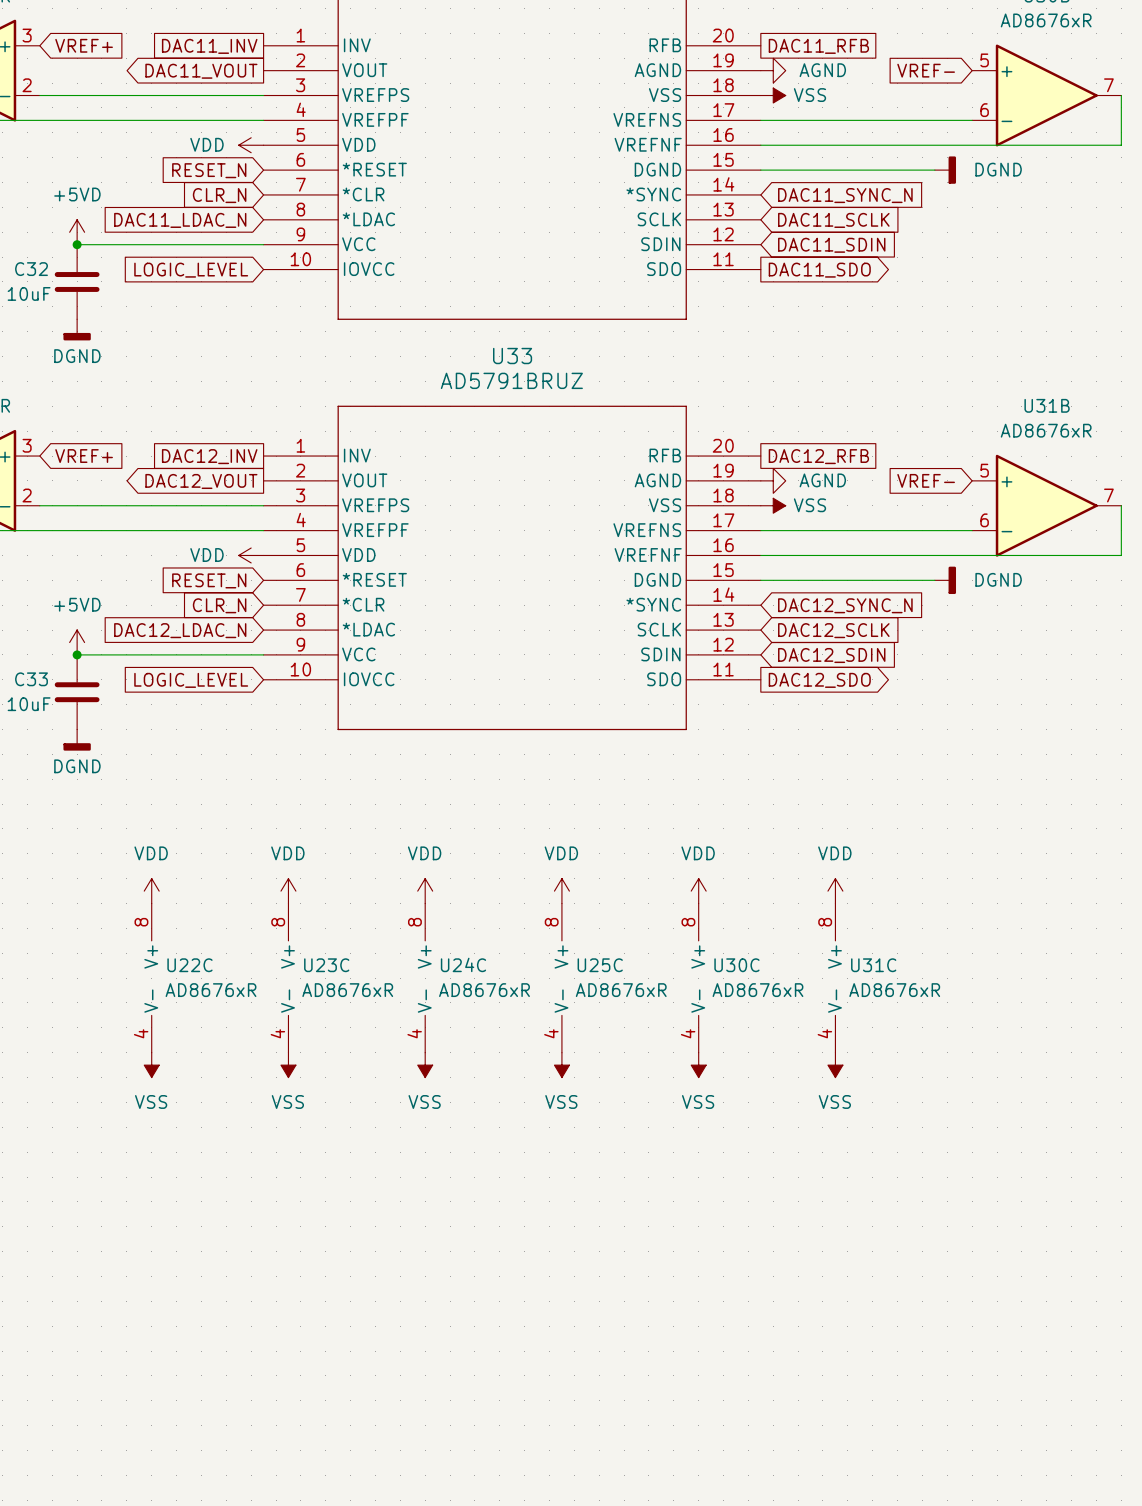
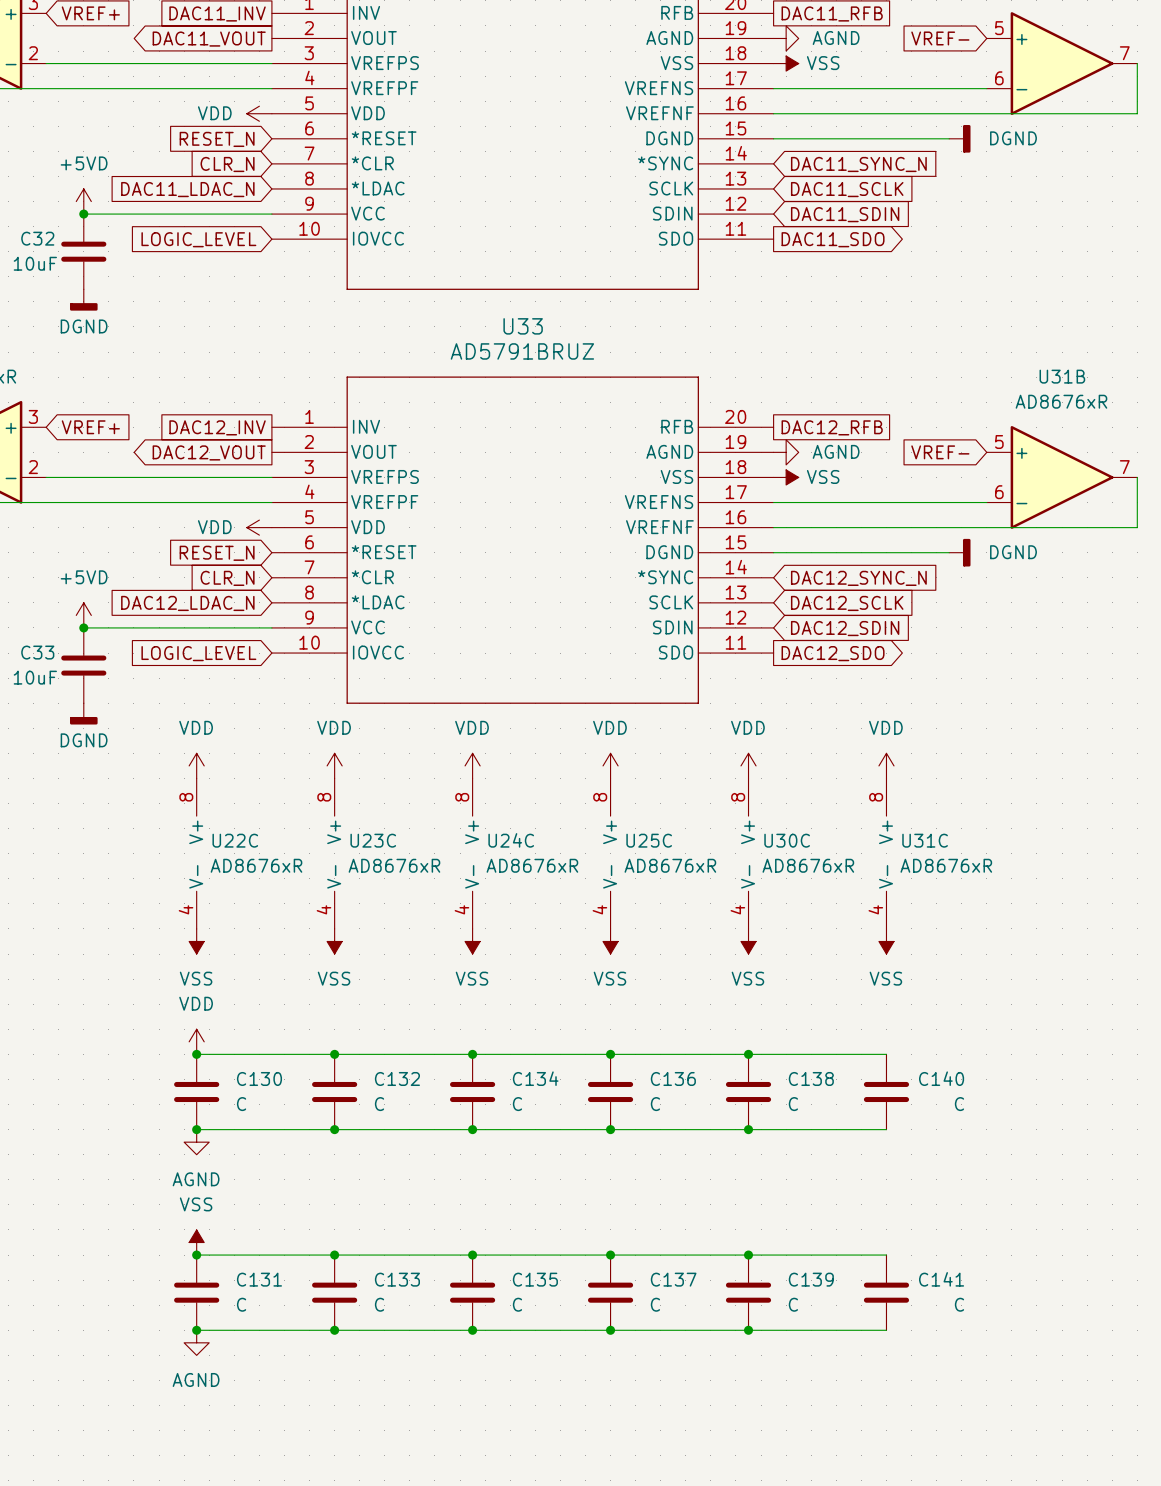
power symbol: none -> VDD (196, 765)
power symbol: none -> VDD (334, 765)
power symbol: none -> VDD (472, 765)
power symbol: none -> VDD (610, 765)
power symbol: none -> VDD (748, 765)
power symbol: none -> VDD (886, 765)
power symbol: VDD (151, 891) -> none
power symbol: VDD (288, 891) -> none
power symbol: VDD (425, 891) -> none
power symbol: VDD (561, 891) -> none
power symbol: VDD (698, 891) -> none
power symbol: VDD (835, 891) -> none
power symbol: none -> VSS (196, 941)
power symbol: none -> VSS (334, 941)
power symbol: none -> VSS (472, 941)
power symbol: none -> VSS (610, 941)
power symbol: none -> VSS (748, 941)
power symbol: none -> VSS (886, 941)
U22C position: (151, 978) -> (196, 853)
U23C position: (288, 978) -> (334, 853)
U24C position: (425, 978) -> (472, 853)
U25C position: (561, 978) -> (610, 853)
U30C position: (698, 978) -> (748, 853)
U31C position: (835, 978) -> (886, 853)
power symbol: VSS (151, 1065) -> none
power symbol: none -> VDD (196, 1041)
power symbol: VSS (288, 1065) -> none
power symbol: VSS (425, 1065) -> none
power symbol: VSS (561, 1065) -> none
power symbol: VSS (698, 1065) -> none
power symbol: VSS (835, 1065) -> none
wire: none -> (196, 1054) (886, 1054)
junction: none -> (196, 1054)
junction: none -> (334, 1054)
junction: none -> (472, 1054)
junction: none -> (610, 1054)
junction: none -> (748, 1054)
C130: none -> C (196, 1091)
C132: none -> C (334, 1091)
C134: none -> C (472, 1091)
C136: none -> C (610, 1091)
C138: none -> C (748, 1091)
C140: none -> C (886, 1091)
wire: none -> (196, 1129) (886, 1129)
junction: none -> (196, 1129)
junction: none -> (334, 1129)
junction: none -> (472, 1129)
junction: none -> (610, 1129)
junction: none -> (748, 1129)
power symbol: none -> AGND (196, 1142)
power symbol: none -> VSS (196, 1242)
wire: none -> (196, 1255) (886, 1255)
junction: none -> (196, 1255)
junction: none -> (334, 1255)
junction: none -> (472, 1255)
junction: none -> (610, 1255)
junction: none -> (748, 1255)
C131: none -> C (196, 1292)
C133: none -> C (334, 1292)
C135: none -> C (472, 1292)
C137: none -> C (610, 1292)
C139: none -> C (748, 1292)
C141: none -> C (886, 1292)
wire: none -> (196, 1330) (886, 1330)
junction: none -> (196, 1330)
junction: none -> (334, 1330)
junction: none -> (472, 1330)
junction: none -> (610, 1330)
junction: none -> (748, 1330)
power symbol: none -> AGND (196, 1342)

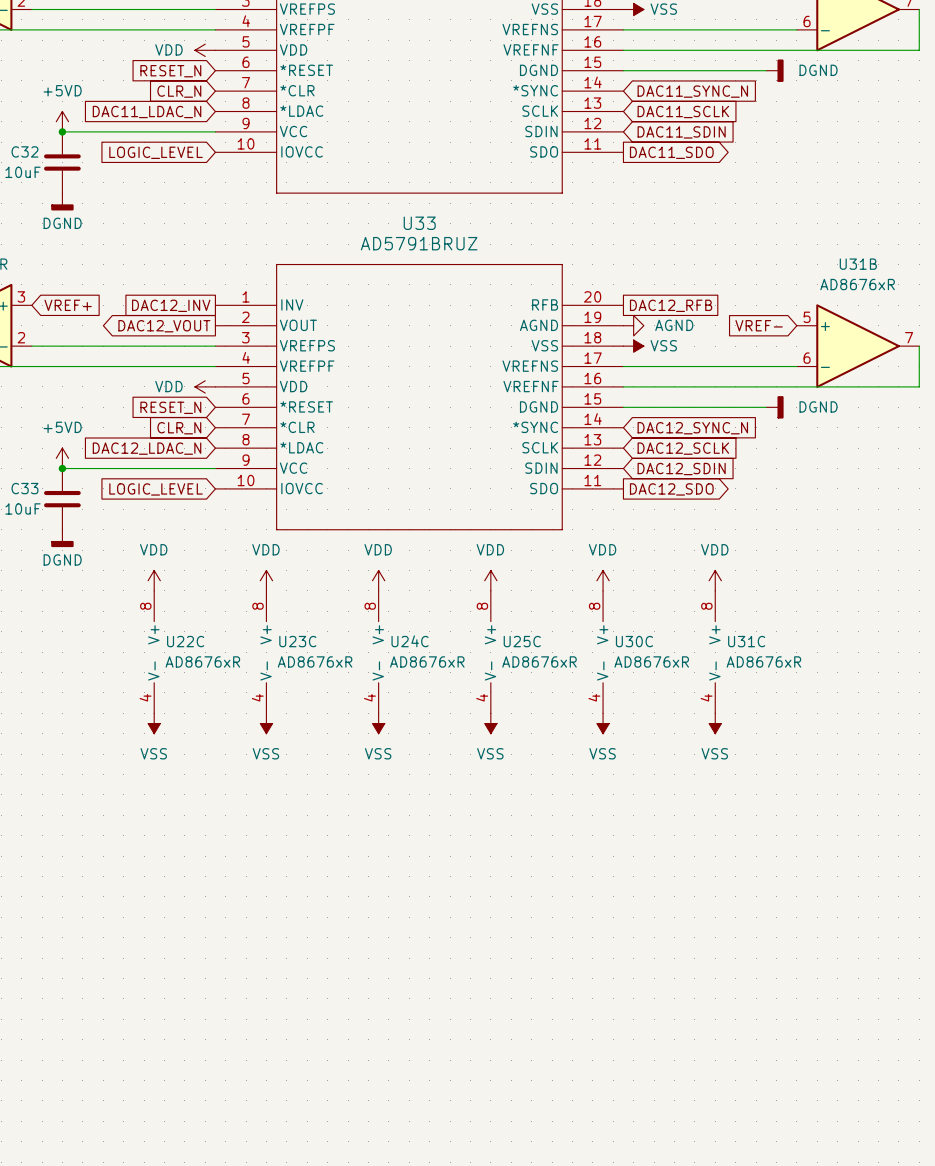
power symbol: VDD (196, 1041) -> none
wire: (196, 1054) (886, 1054) -> none
junction: (196, 1054) -> none
junction: (334, 1054) -> none
junction: (472, 1054) -> none
junction: (610, 1054) -> none
junction: (748, 1054) -> none
C130: C (196, 1091) -> none
C132: C (334, 1091) -> none
C134: C (472, 1091) -> none
C136: C (610, 1091) -> none
C138: C (748, 1091) -> none
C140: C (886, 1091) -> none
wire: (196, 1129) (886, 1129) -> none
junction: (196, 1129) -> none
junction: (334, 1129) -> none
junction: (472, 1129) -> none
junction: (610, 1129) -> none
junction: (748, 1129) -> none
power symbol: AGND (196, 1142) -> none
power symbol: VSS (196, 1242) -> none
wire: (196, 1255) (886, 1255) -> none
junction: (196, 1255) -> none
junction: (334, 1255) -> none
junction: (472, 1255) -> none
junction: (610, 1255) -> none
junction: (748, 1255) -> none
C131: C (196, 1292) -> none
C133: C (334, 1292) -> none
C135: C (472, 1292) -> none
C137: C (610, 1292) -> none
C139: C (748, 1292) -> none
C141: C (886, 1292) -> none
wire: (196, 1330) (886, 1330) -> none
junction: (196, 1330) -> none
junction: (334, 1330) -> none
junction: (472, 1330) -> none
junction: (610, 1330) -> none
junction: (748, 1330) -> none
power symbol: AGND (196, 1342) -> none

